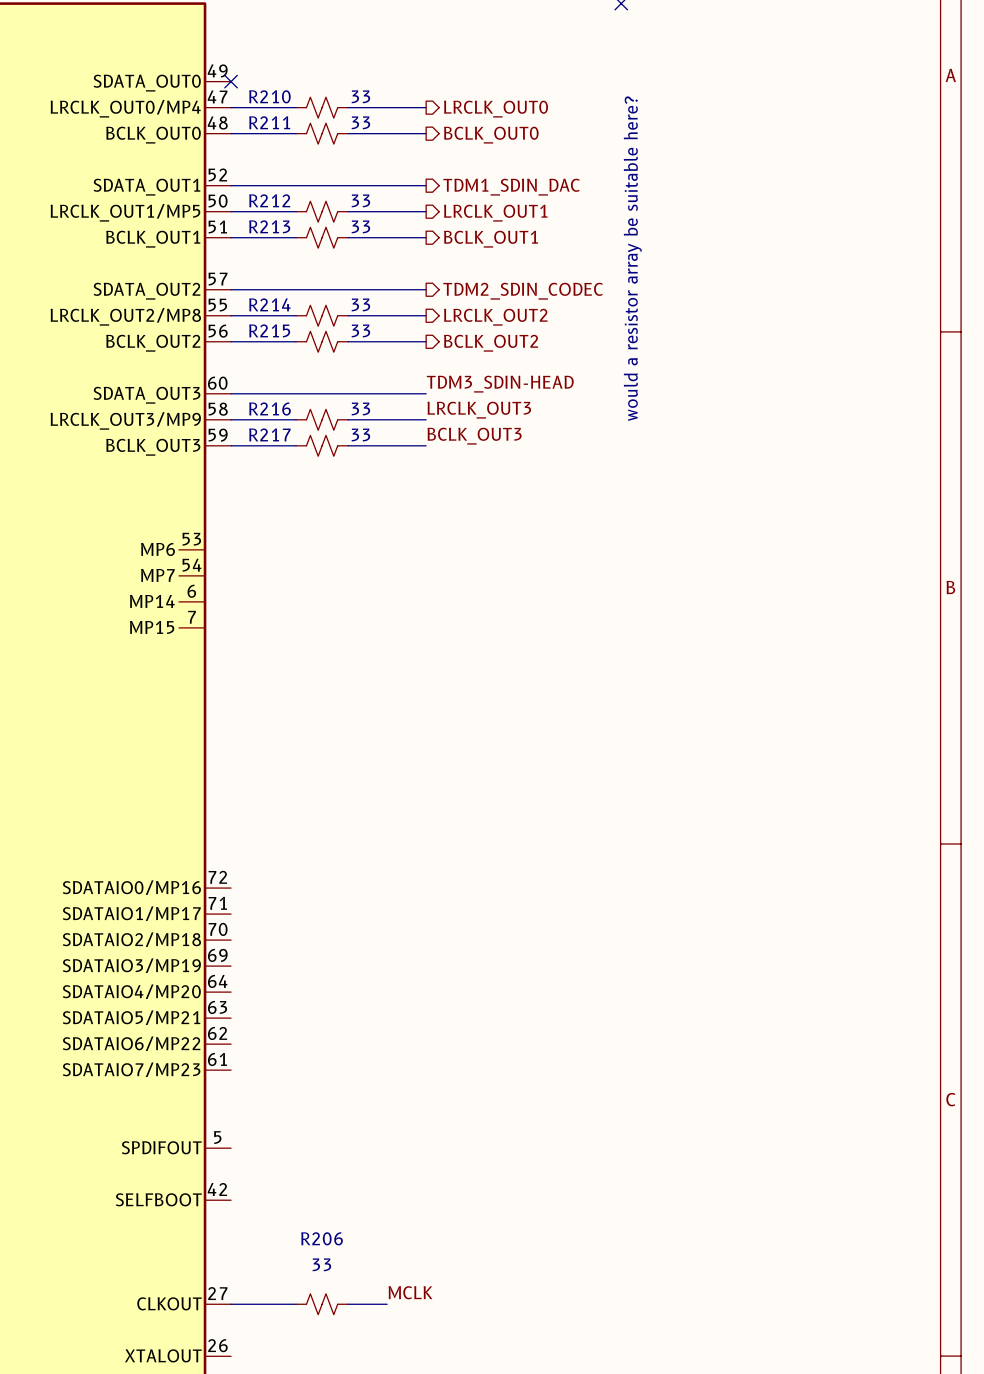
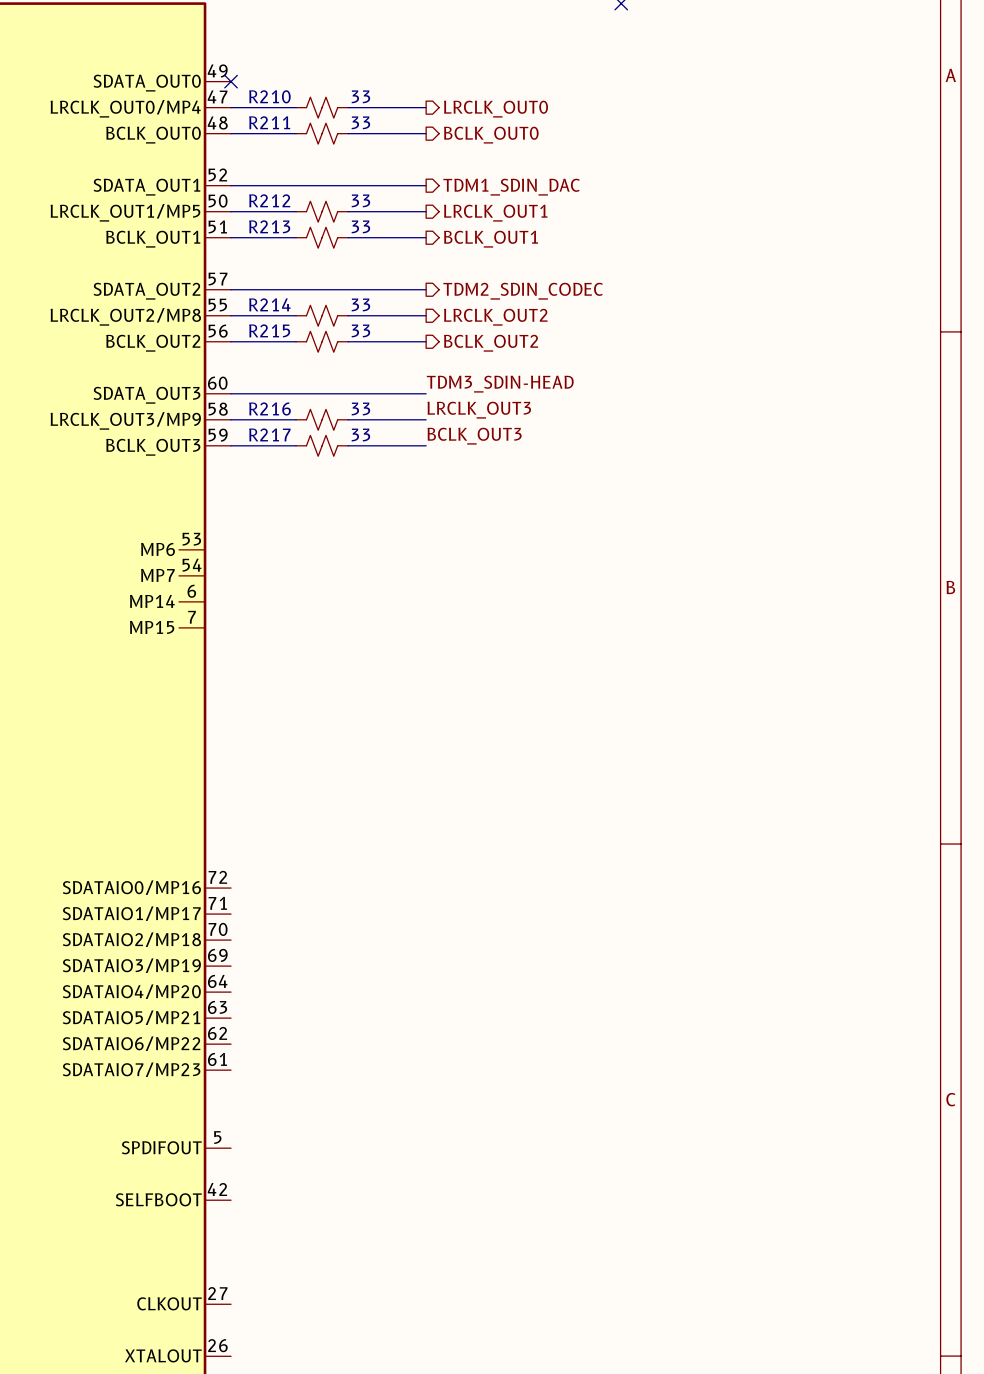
text: would a resistor array be suitable here? (632, 258) -> none
label: MCLK (410, 1292) -> none
wire: (231, 1304) (296, 1304) -> none
R206: 33 (322, 1304) -> none
wire: (348, 1304) (387, 1304) -> none

